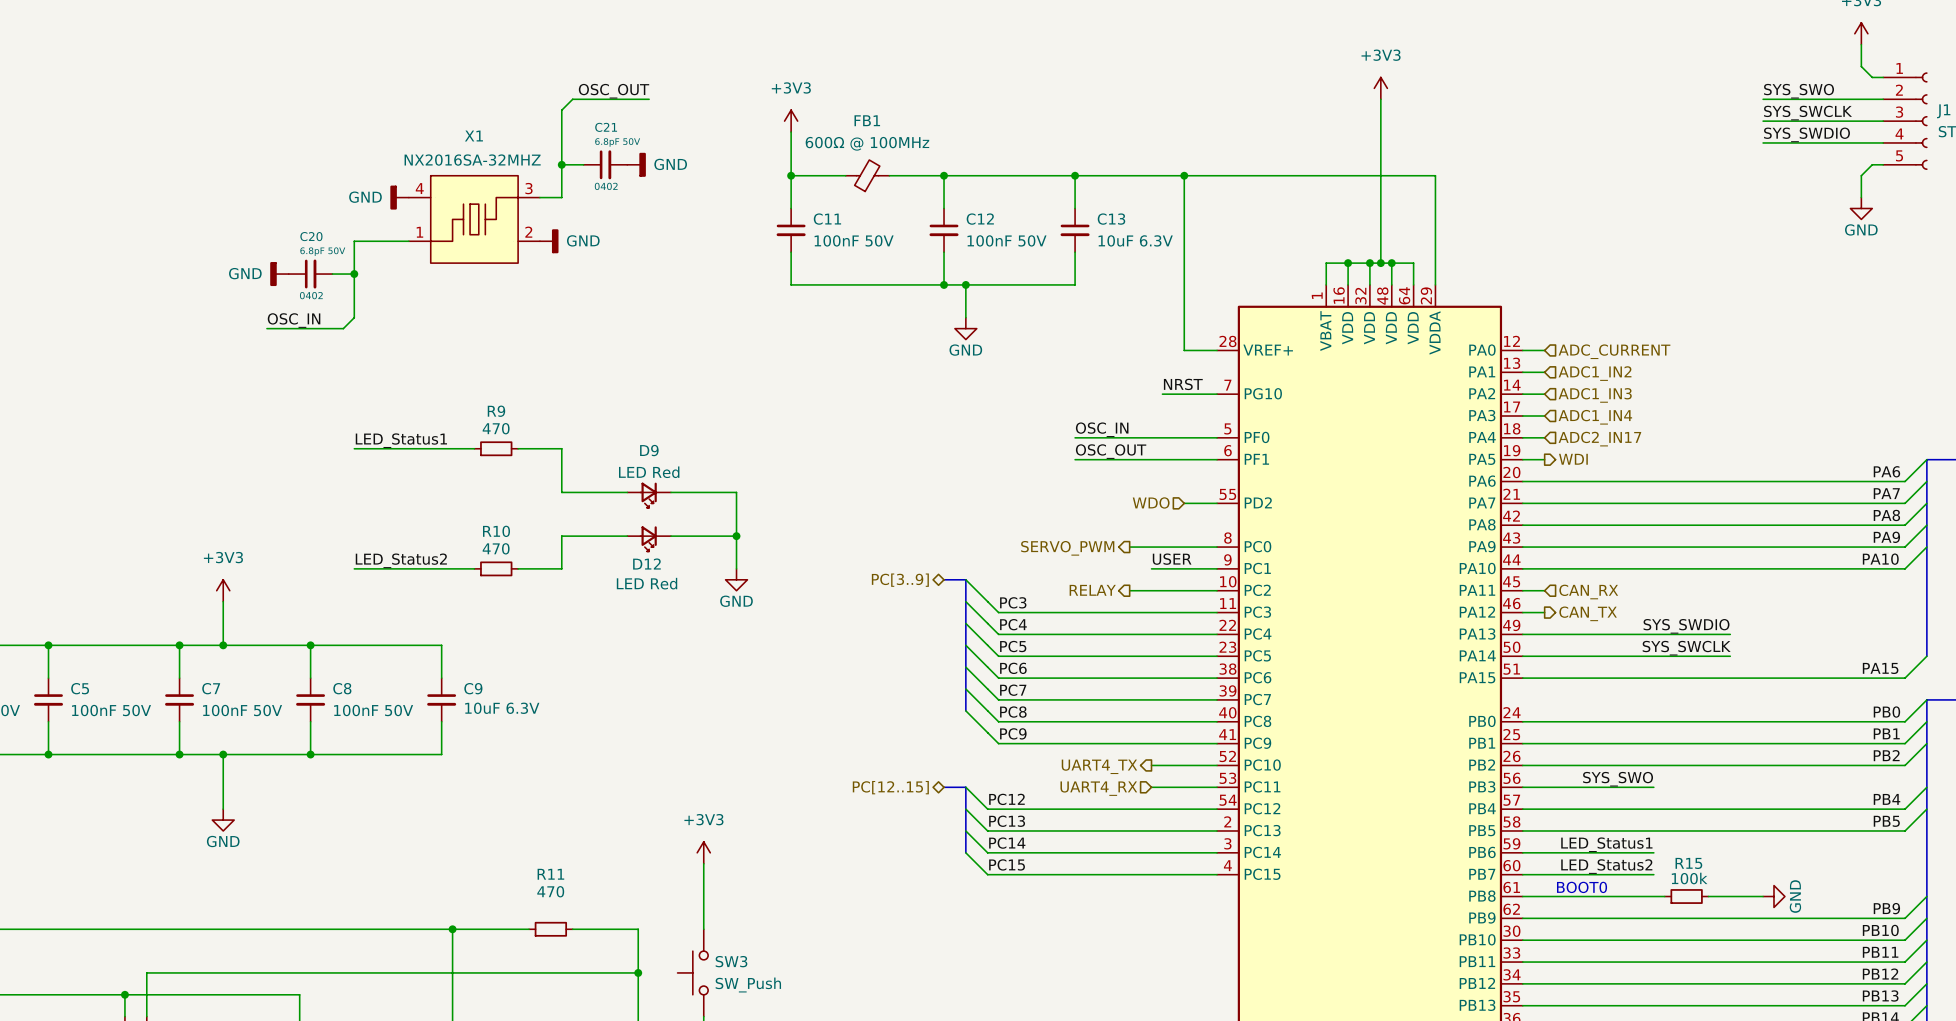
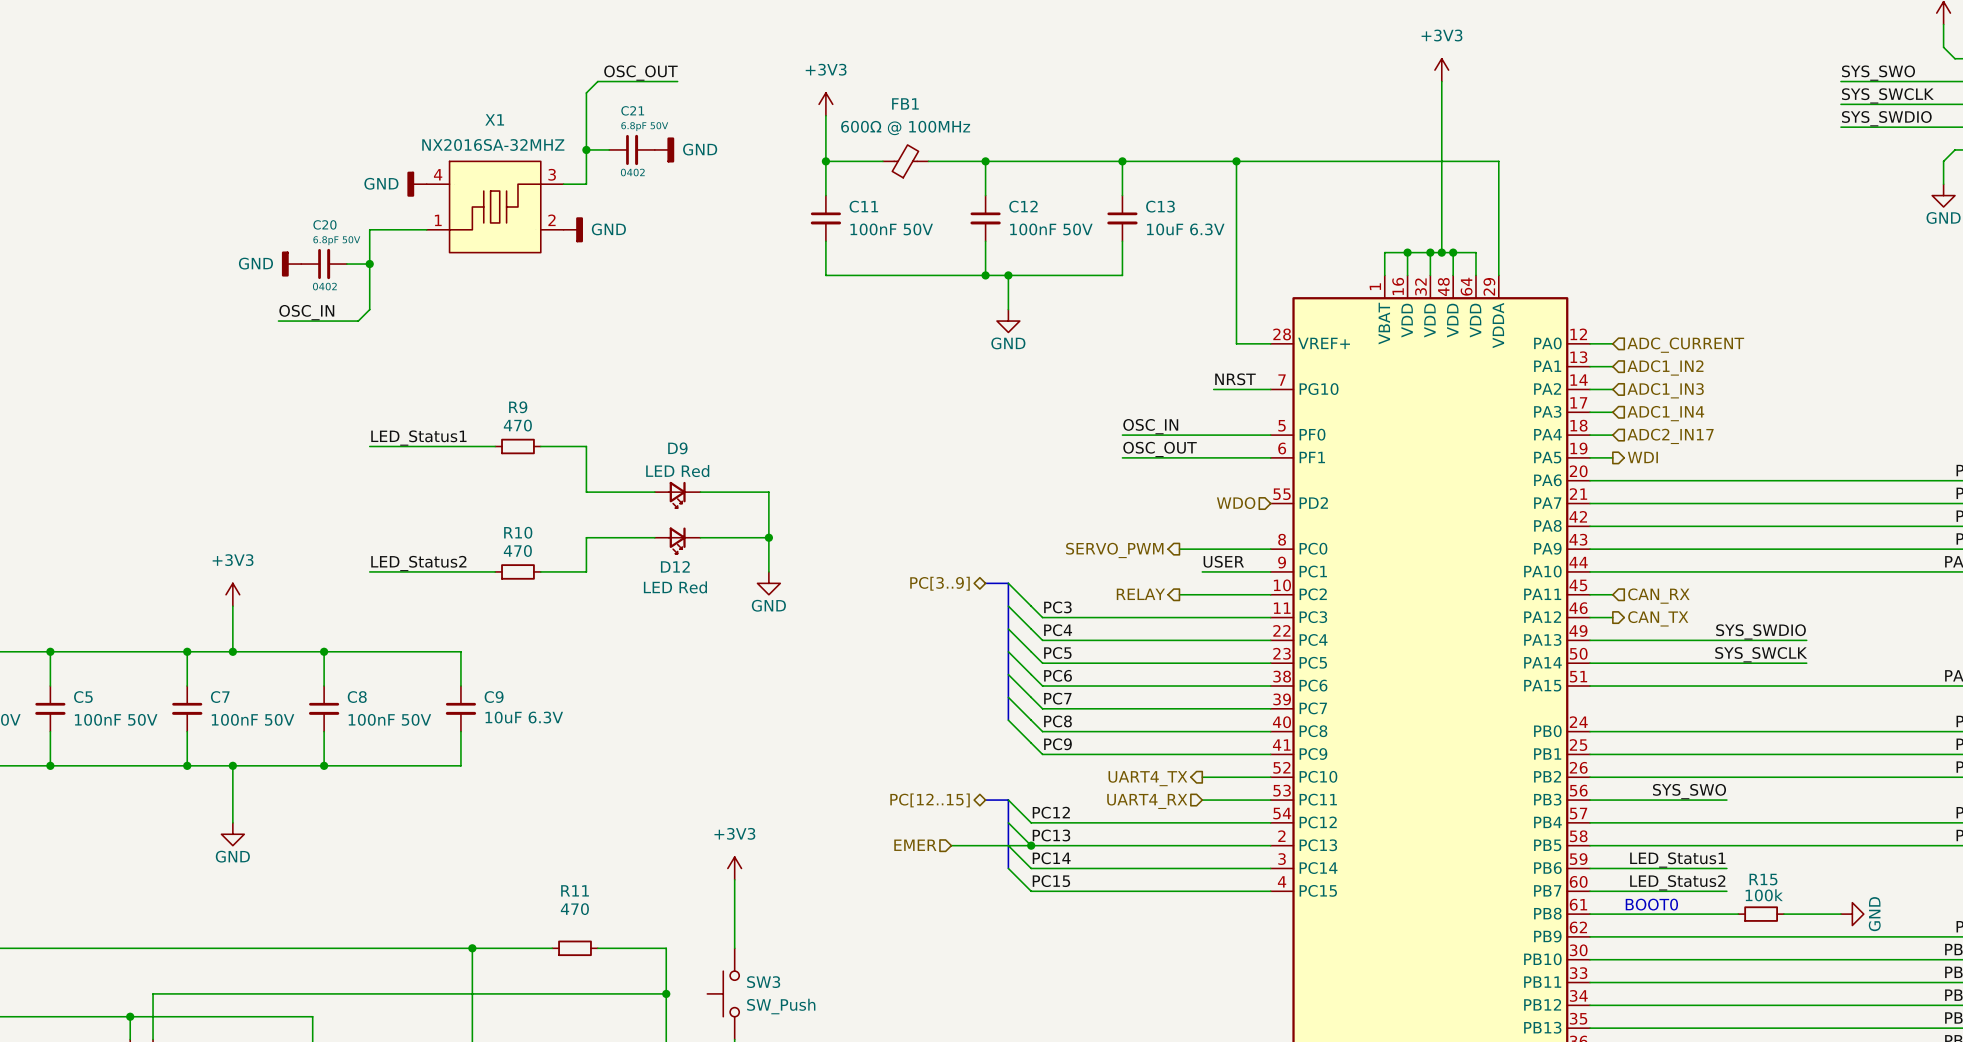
hierarchical label position: WDO (1151, 502) -> WDO (1236, 503)
wire: (1184, 503) (1217, 503) -> none
hierarchical label: none -> EMER (915, 845)
wire: none -> (951, 845) (1031, 845)
junction: none -> (1031, 845)

